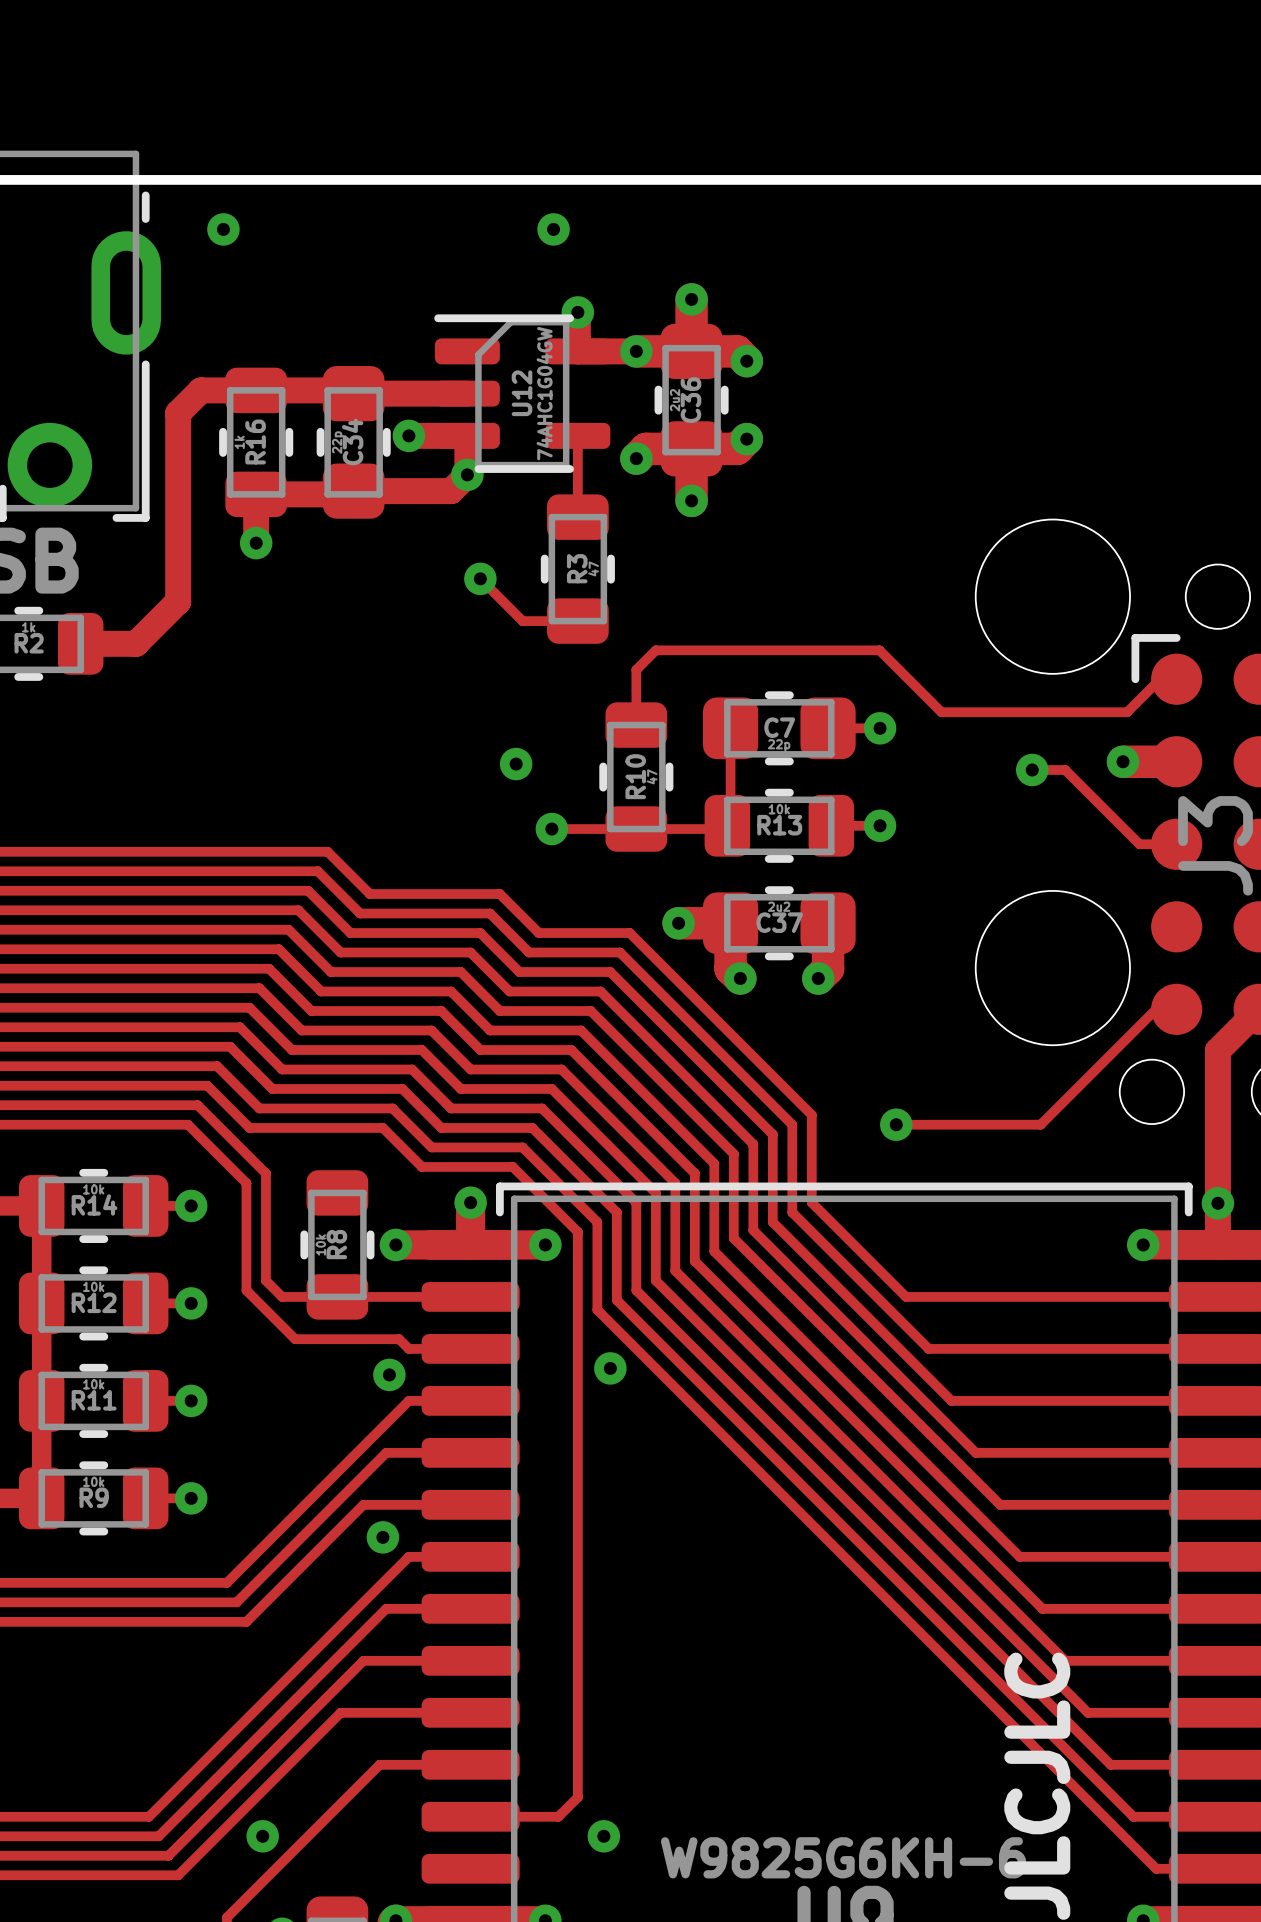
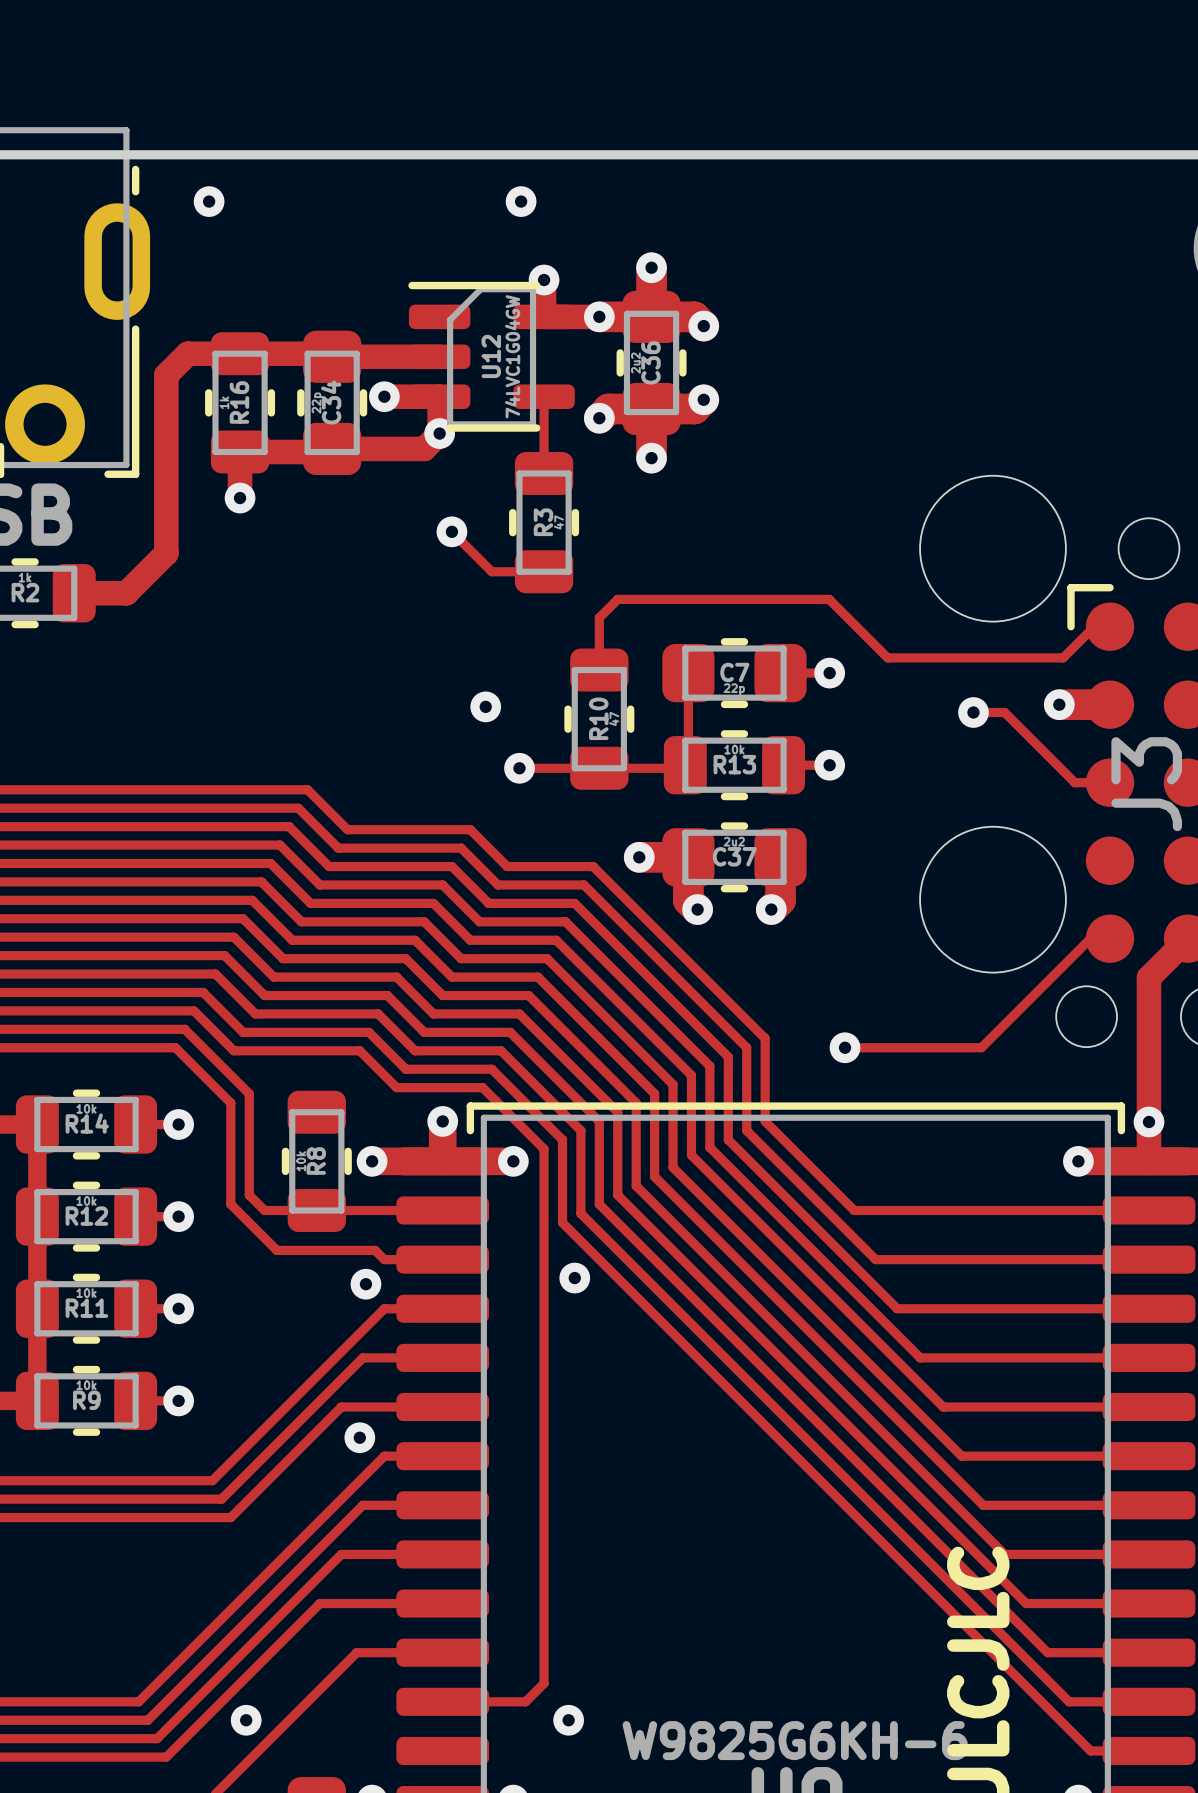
U12 value: 74AHC1G04GW (544, 393) -> 74LVC1G04GW (512, 356)

